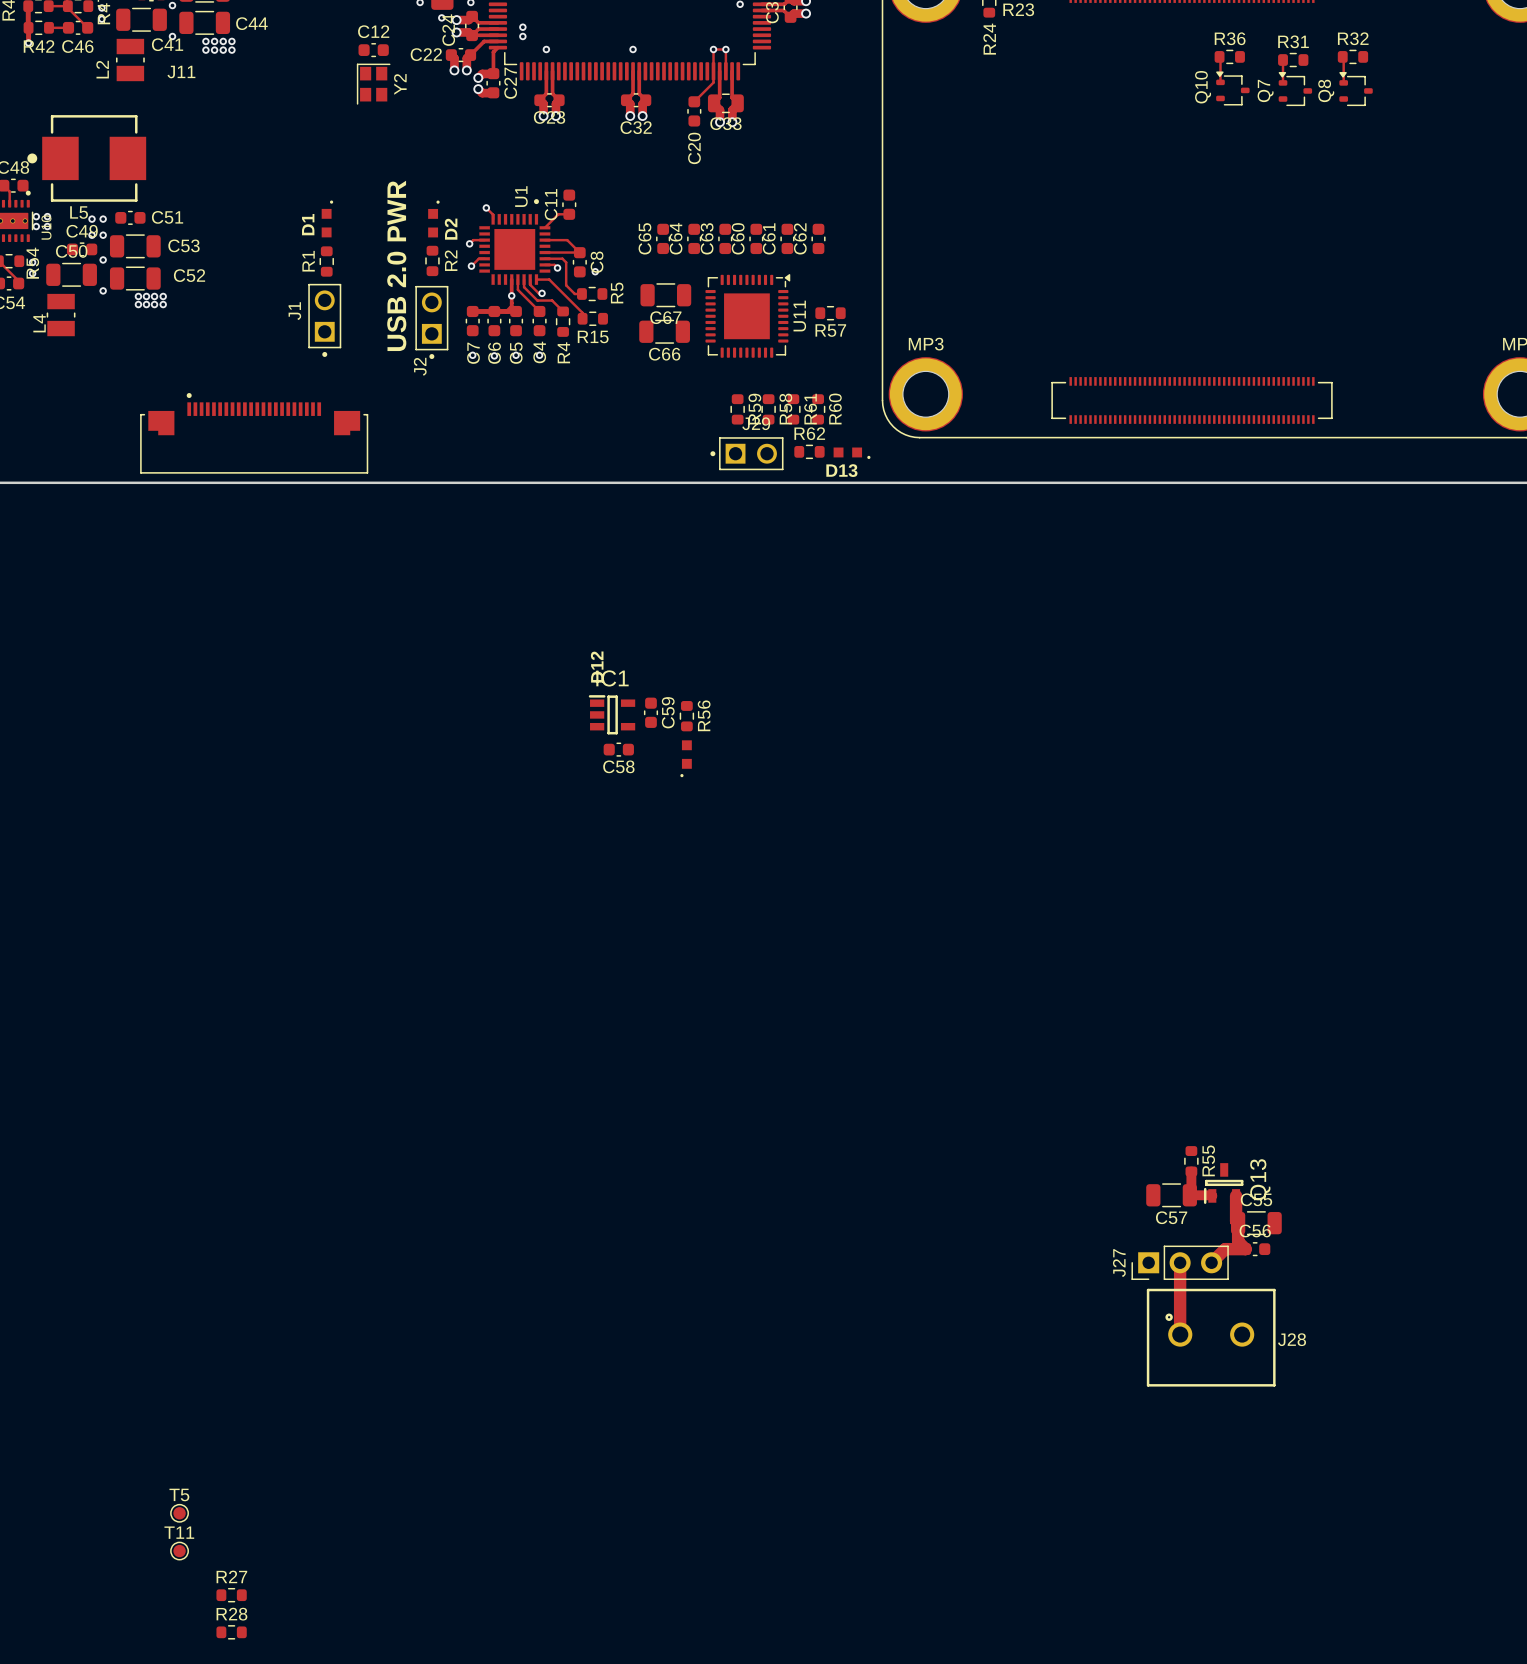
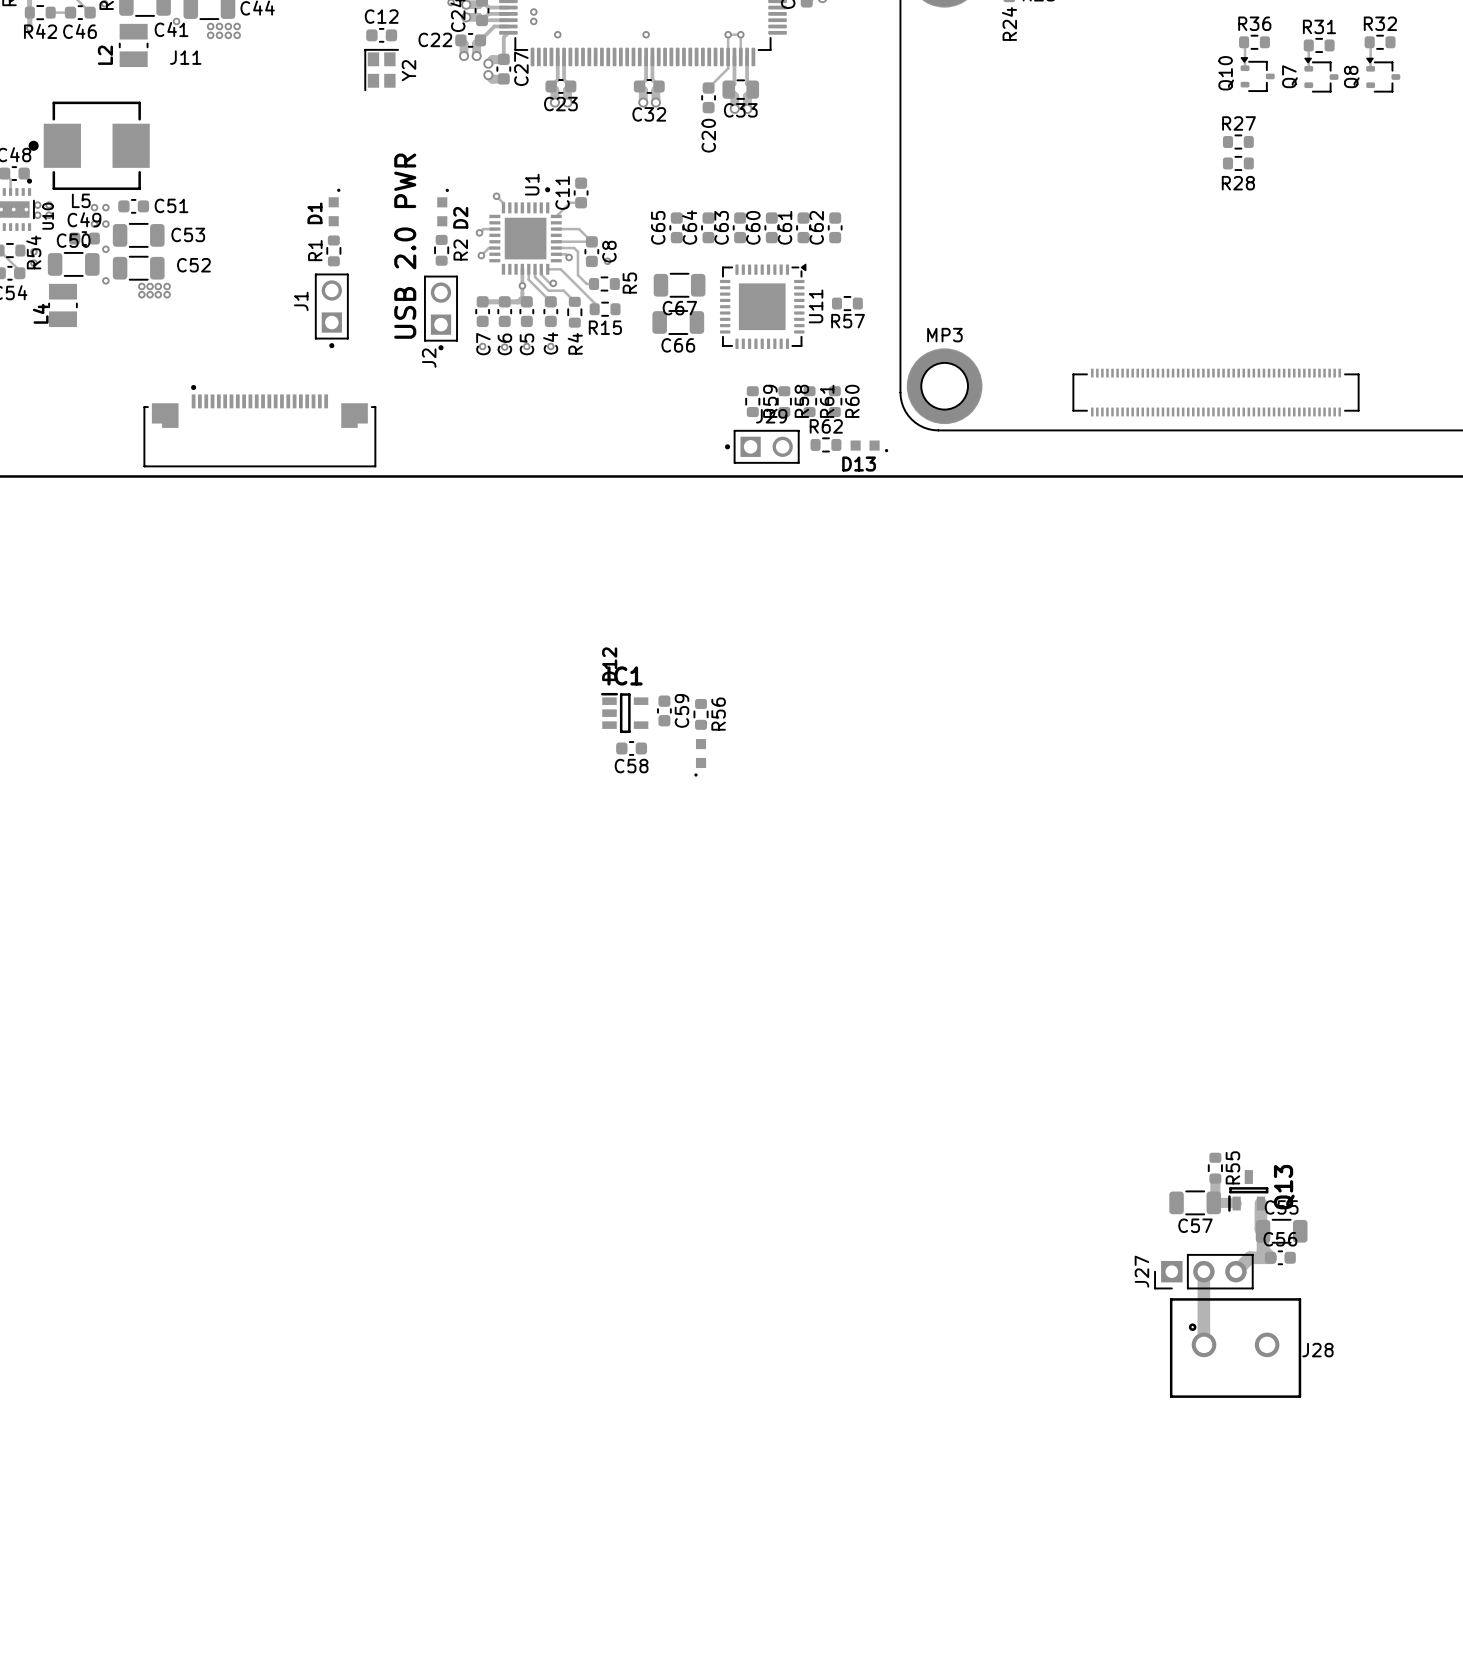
T5: (179, 1513) -> none
T11: (179, 1551) -> none
R27 position: (231, 1595) -> (1238, 142)
R28 name position: R28 (231, 1614) -> R28 (1238, 183)
R28 position: (231, 1632) -> (1238, 163)

